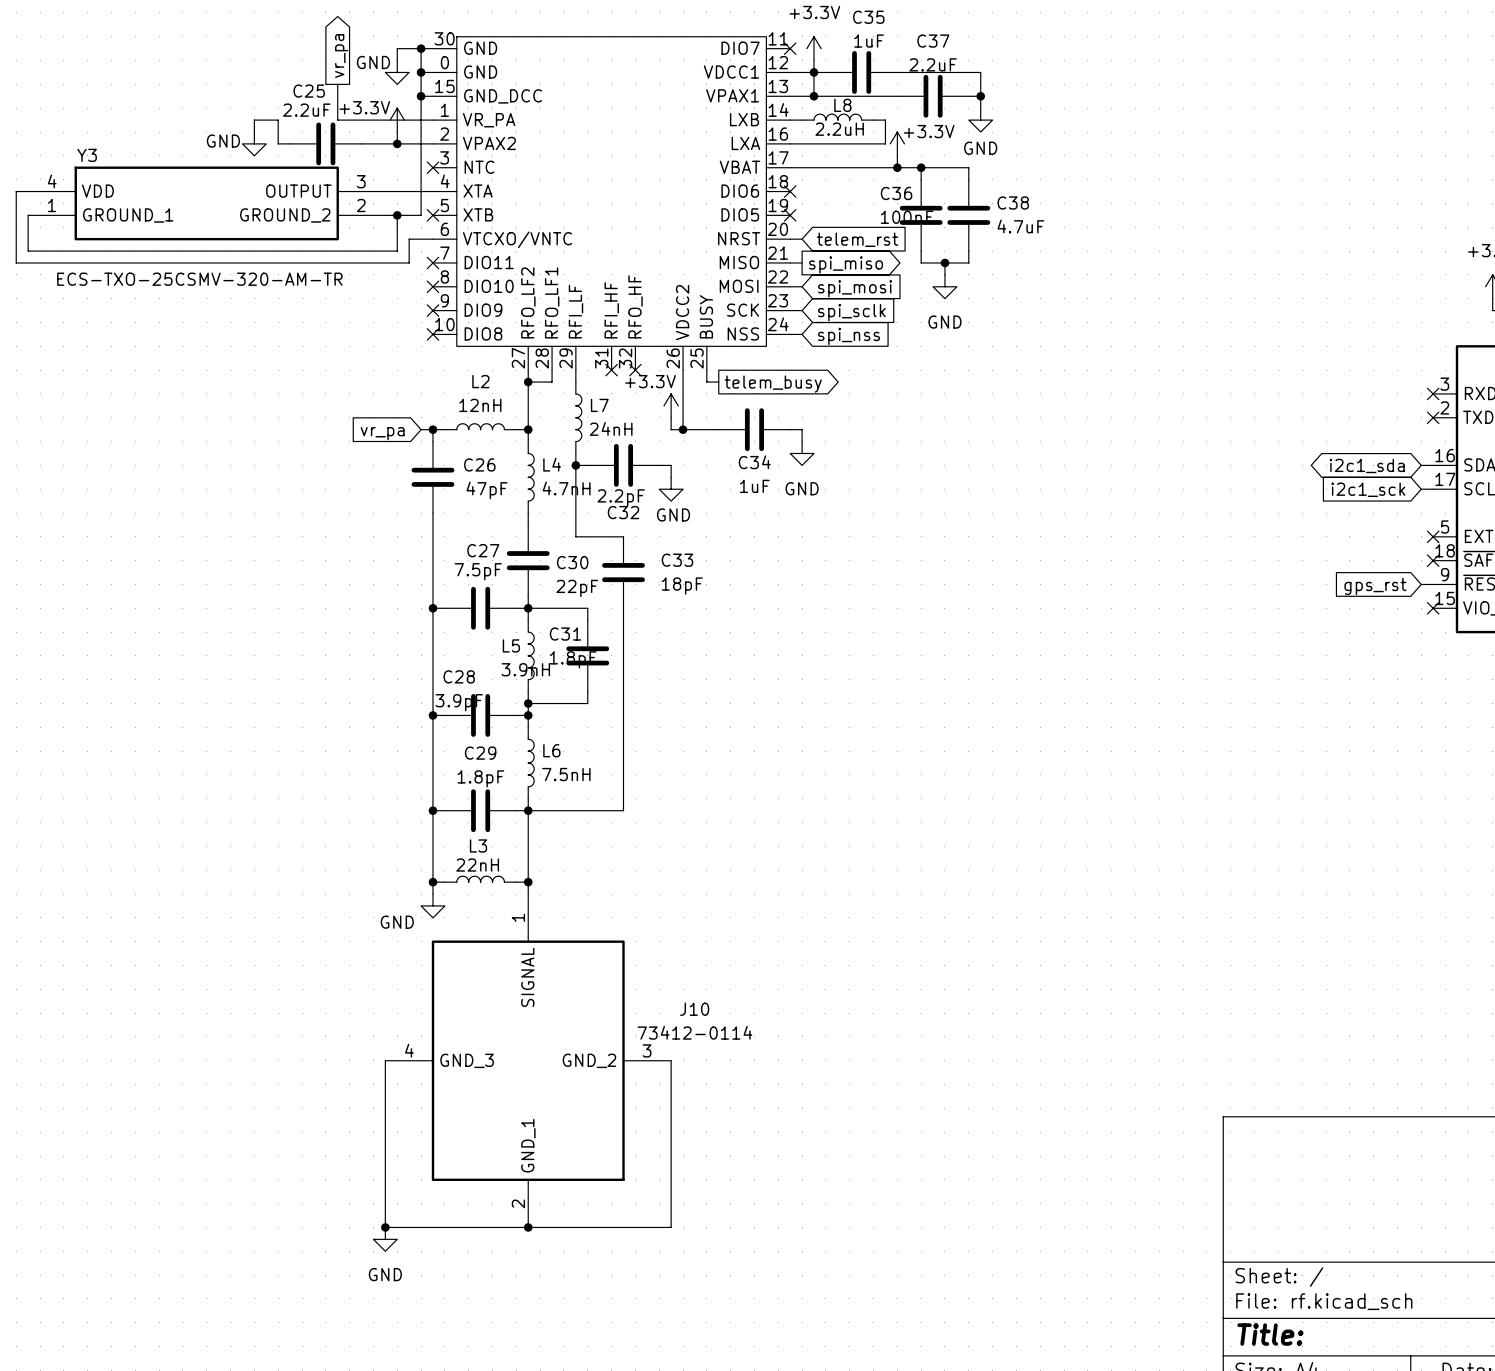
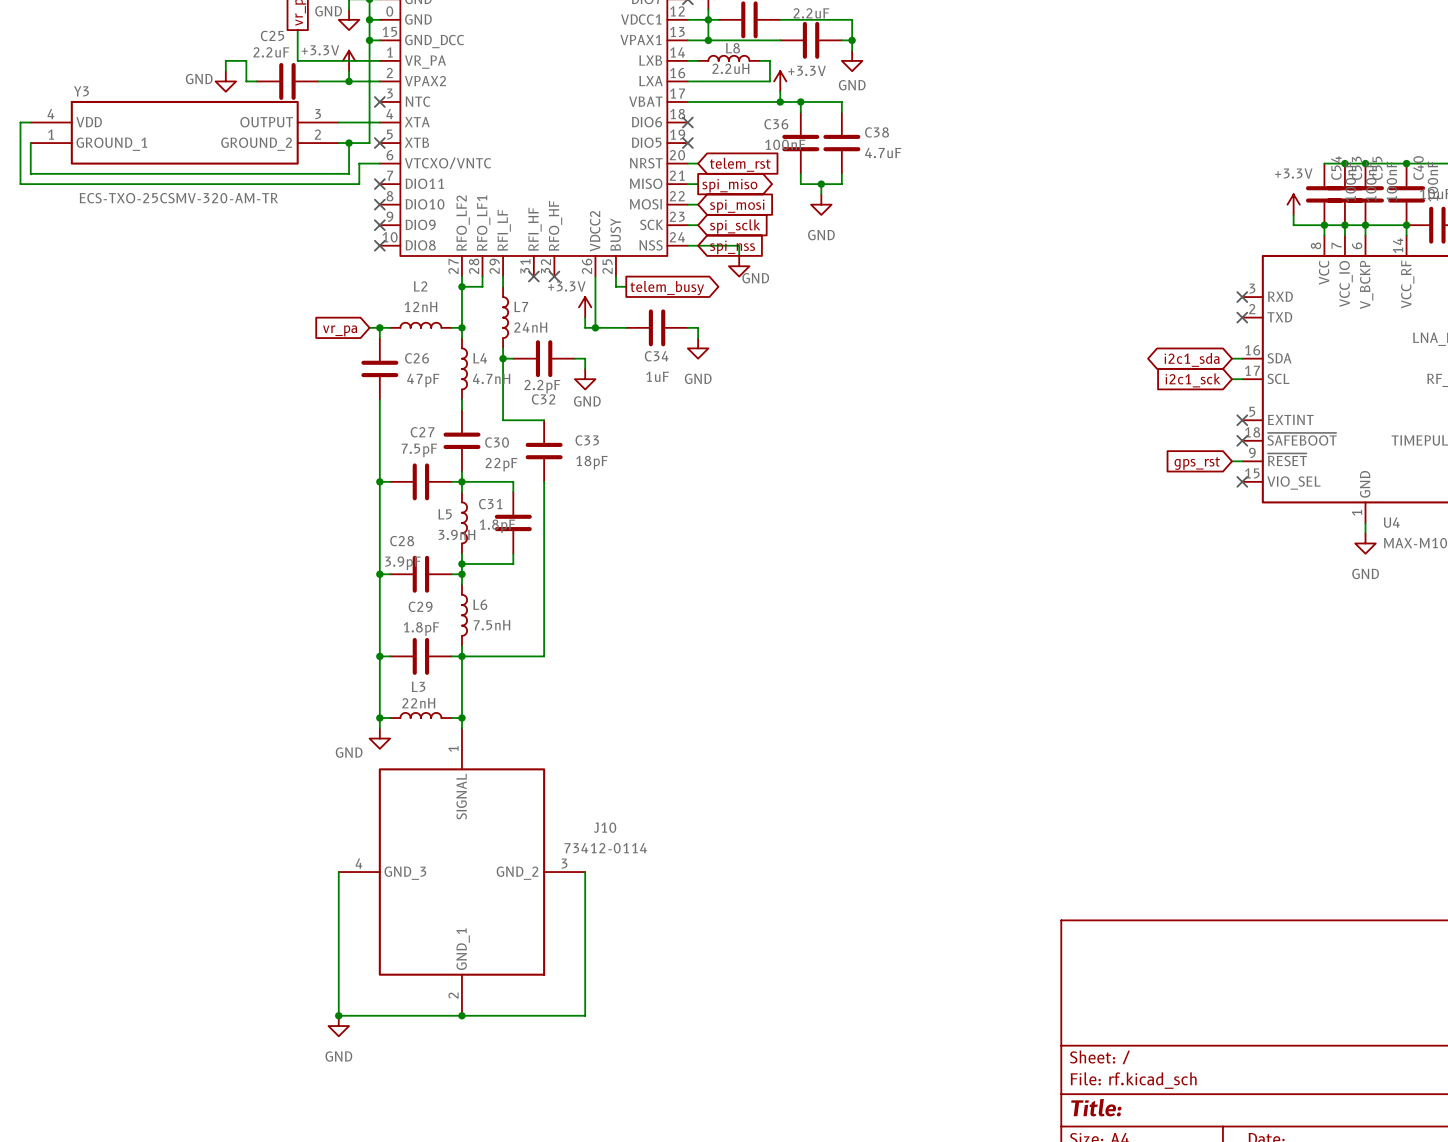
wire: none -> (698, 245) (739, 245) (739, 255)
power symbol: none -> GND (739, 266)

